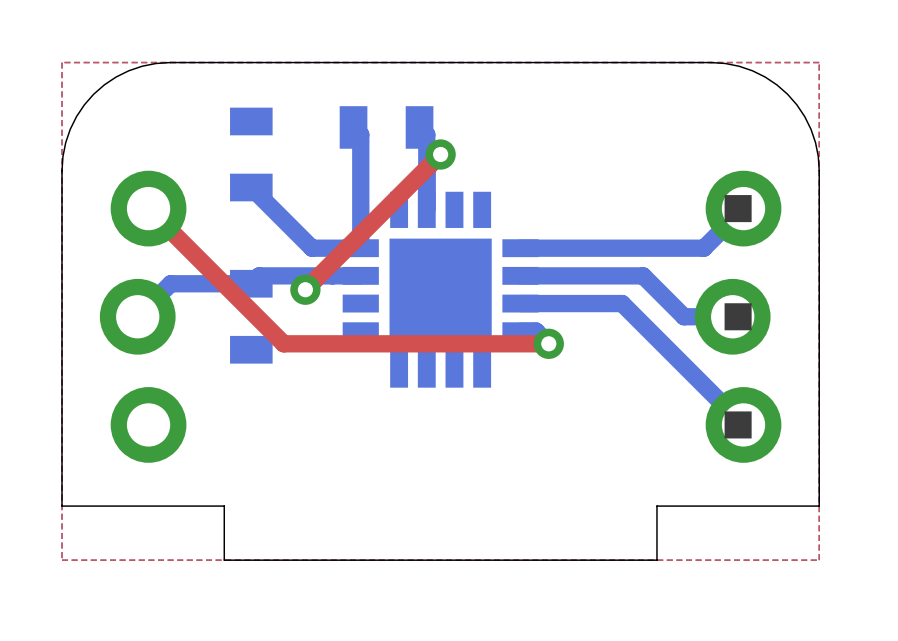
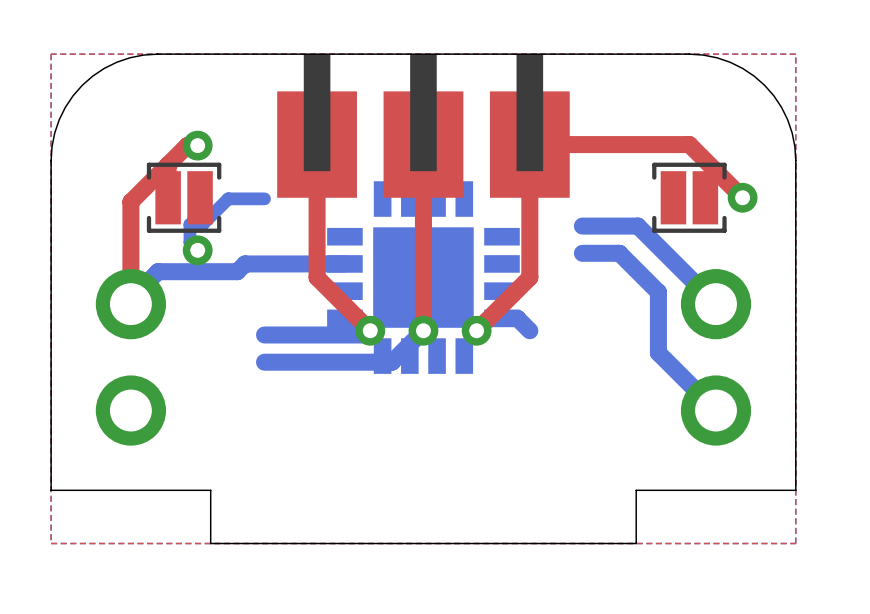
bottom track: (353, 127) (360, 134) (360, 248) (312, 248) (251, 187) -> none
part: none -> (423, 125)
part: (251, 154) -> none
top track: none -> (317, 144) (317, 277) (370, 330)
top track: (440, 154) (305, 289) -> (423, 144) (423, 330)
via: (440, 154) -> none
top track: none -> (197, 145) (187, 145) (130, 201) (130, 304)
via: none -> (197, 145)
top track: (148, 208) (283, 343) (548, 343) -> none
part: none -> (184, 197)
part: none -> (689, 197)
bottom track: (743, 208) (703, 248) (520, 248) -> none
top track: none -> (742, 197) (689, 144) (529, 144) (529, 277) (476, 330)
via: none -> (742, 197)
bottom track: none -> (264, 198) (228, 198) (202, 224) (189, 224) (189, 242) (197, 250)
bottom track: none -> (582, 226) (637, 226) (716, 304)
via: none -> (197, 250)
bottom track: none -> (582, 253) (619, 253) (658, 292) (658, 352) (716, 410)
bottom track: (520, 275) (643, 275) (684, 316) (732, 316) -> none
via: (305, 289) -> none
bottom track: (520, 303) (622, 303) (743, 424) -> none
part: (143, 316) -> none
part: (251, 316) -> none
part: (738, 316) -> none
bottom track: none -> (370, 330) (366, 334) (264, 334)
via: none -> (370, 330)
bottom track: none -> (423, 330) (392, 362) (264, 362)
via: none -> (423, 330)
via: none -> (476, 330)
via: (548, 343) -> none
part: none -> (130, 357)
part: none -> (716, 357)

